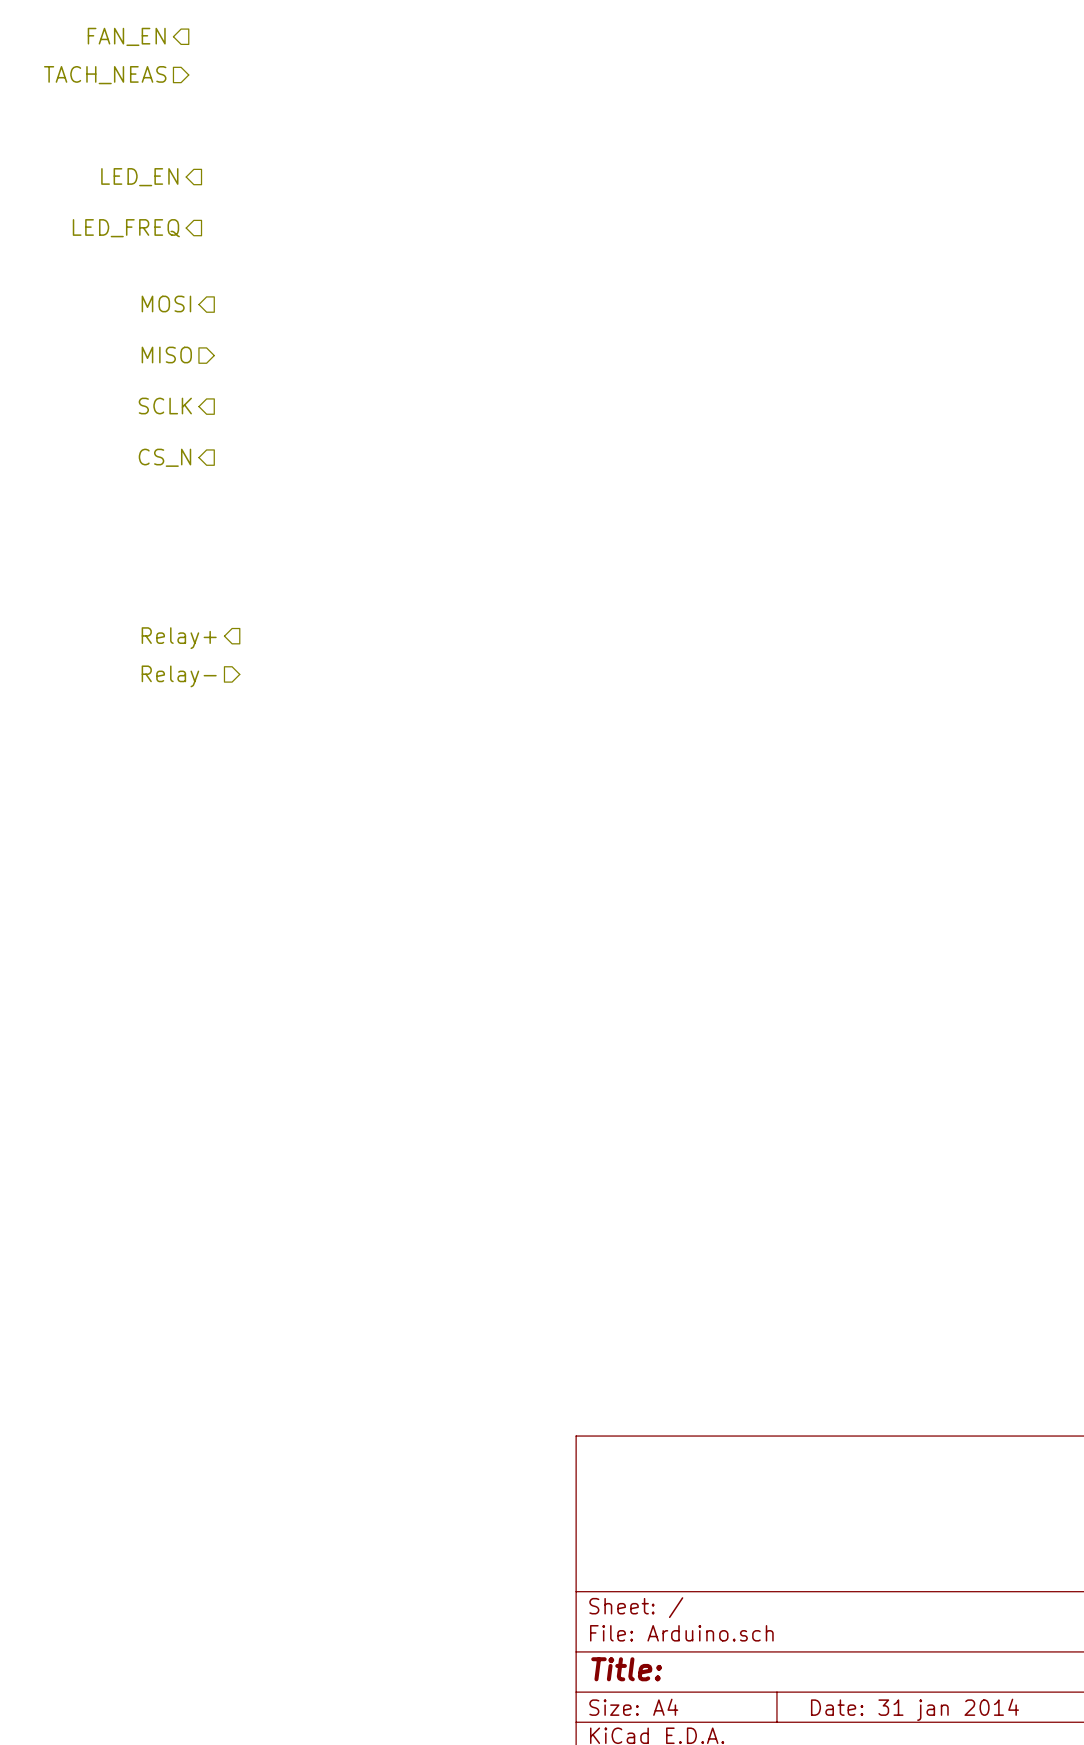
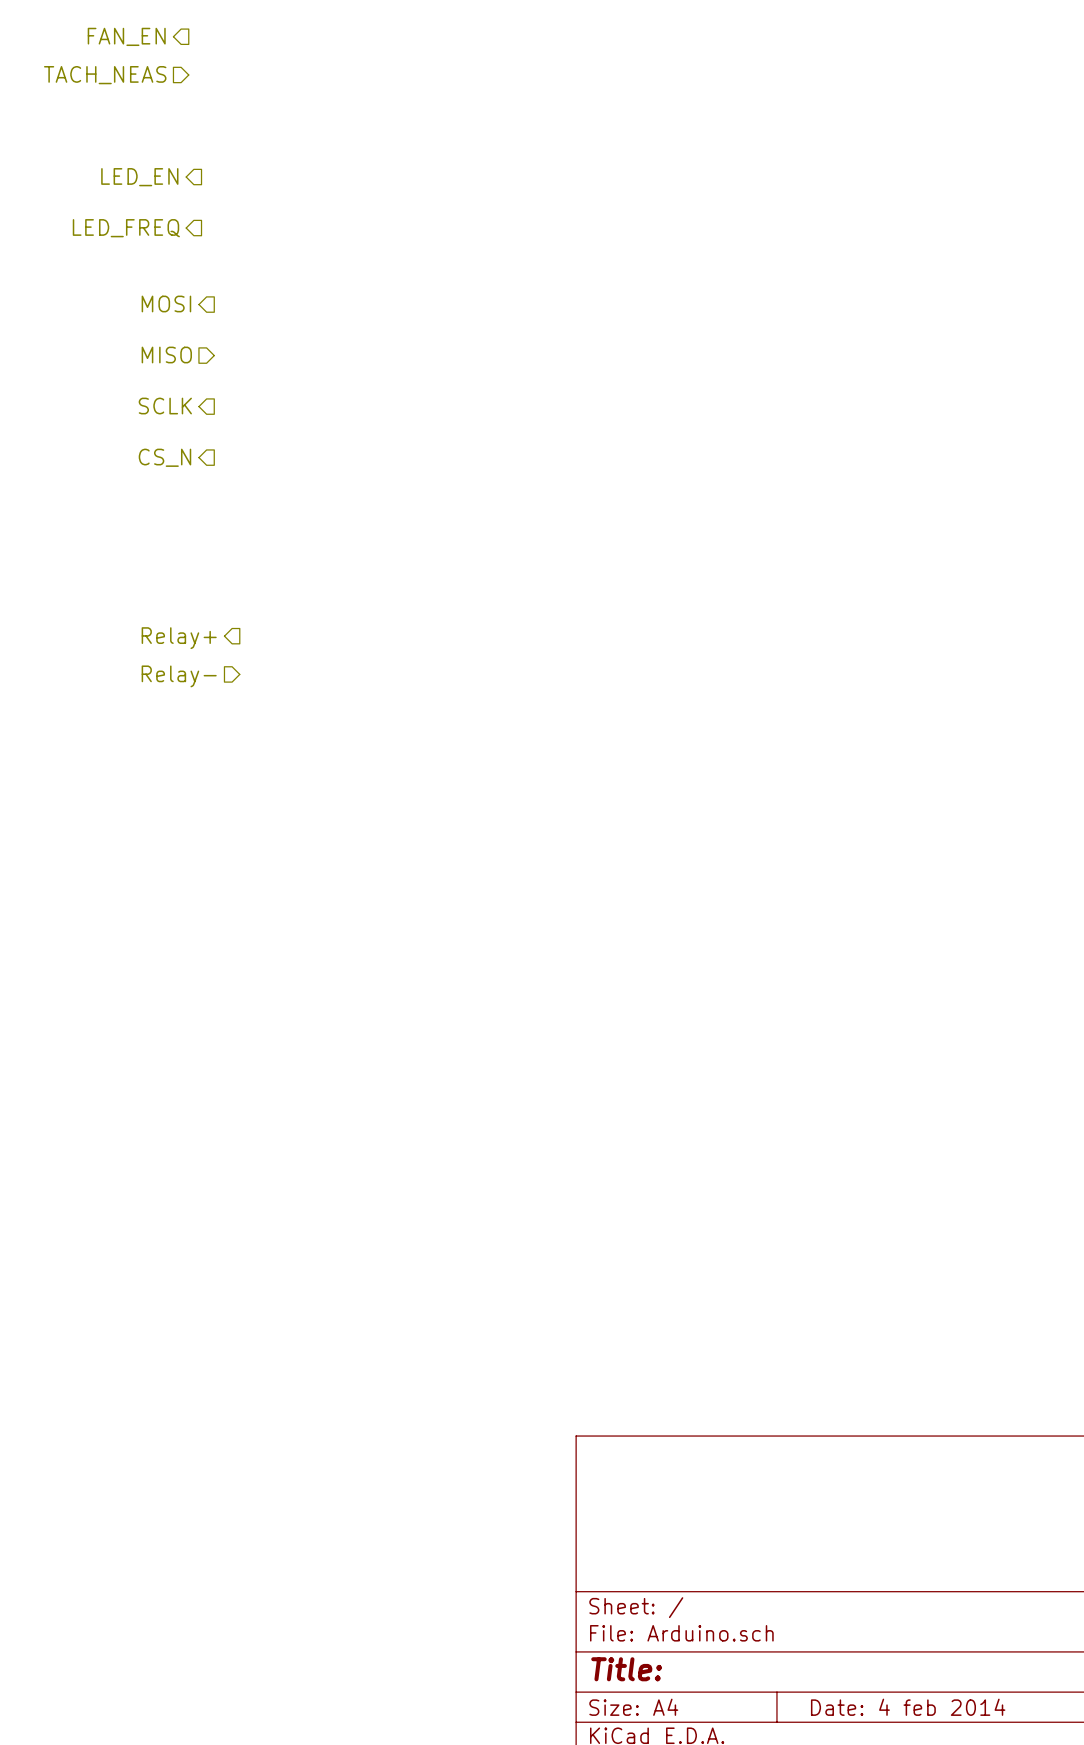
title block: Date: 31 jan 2014 (914, 1709) -> Date: 4 feb 2014 (908, 1707)

